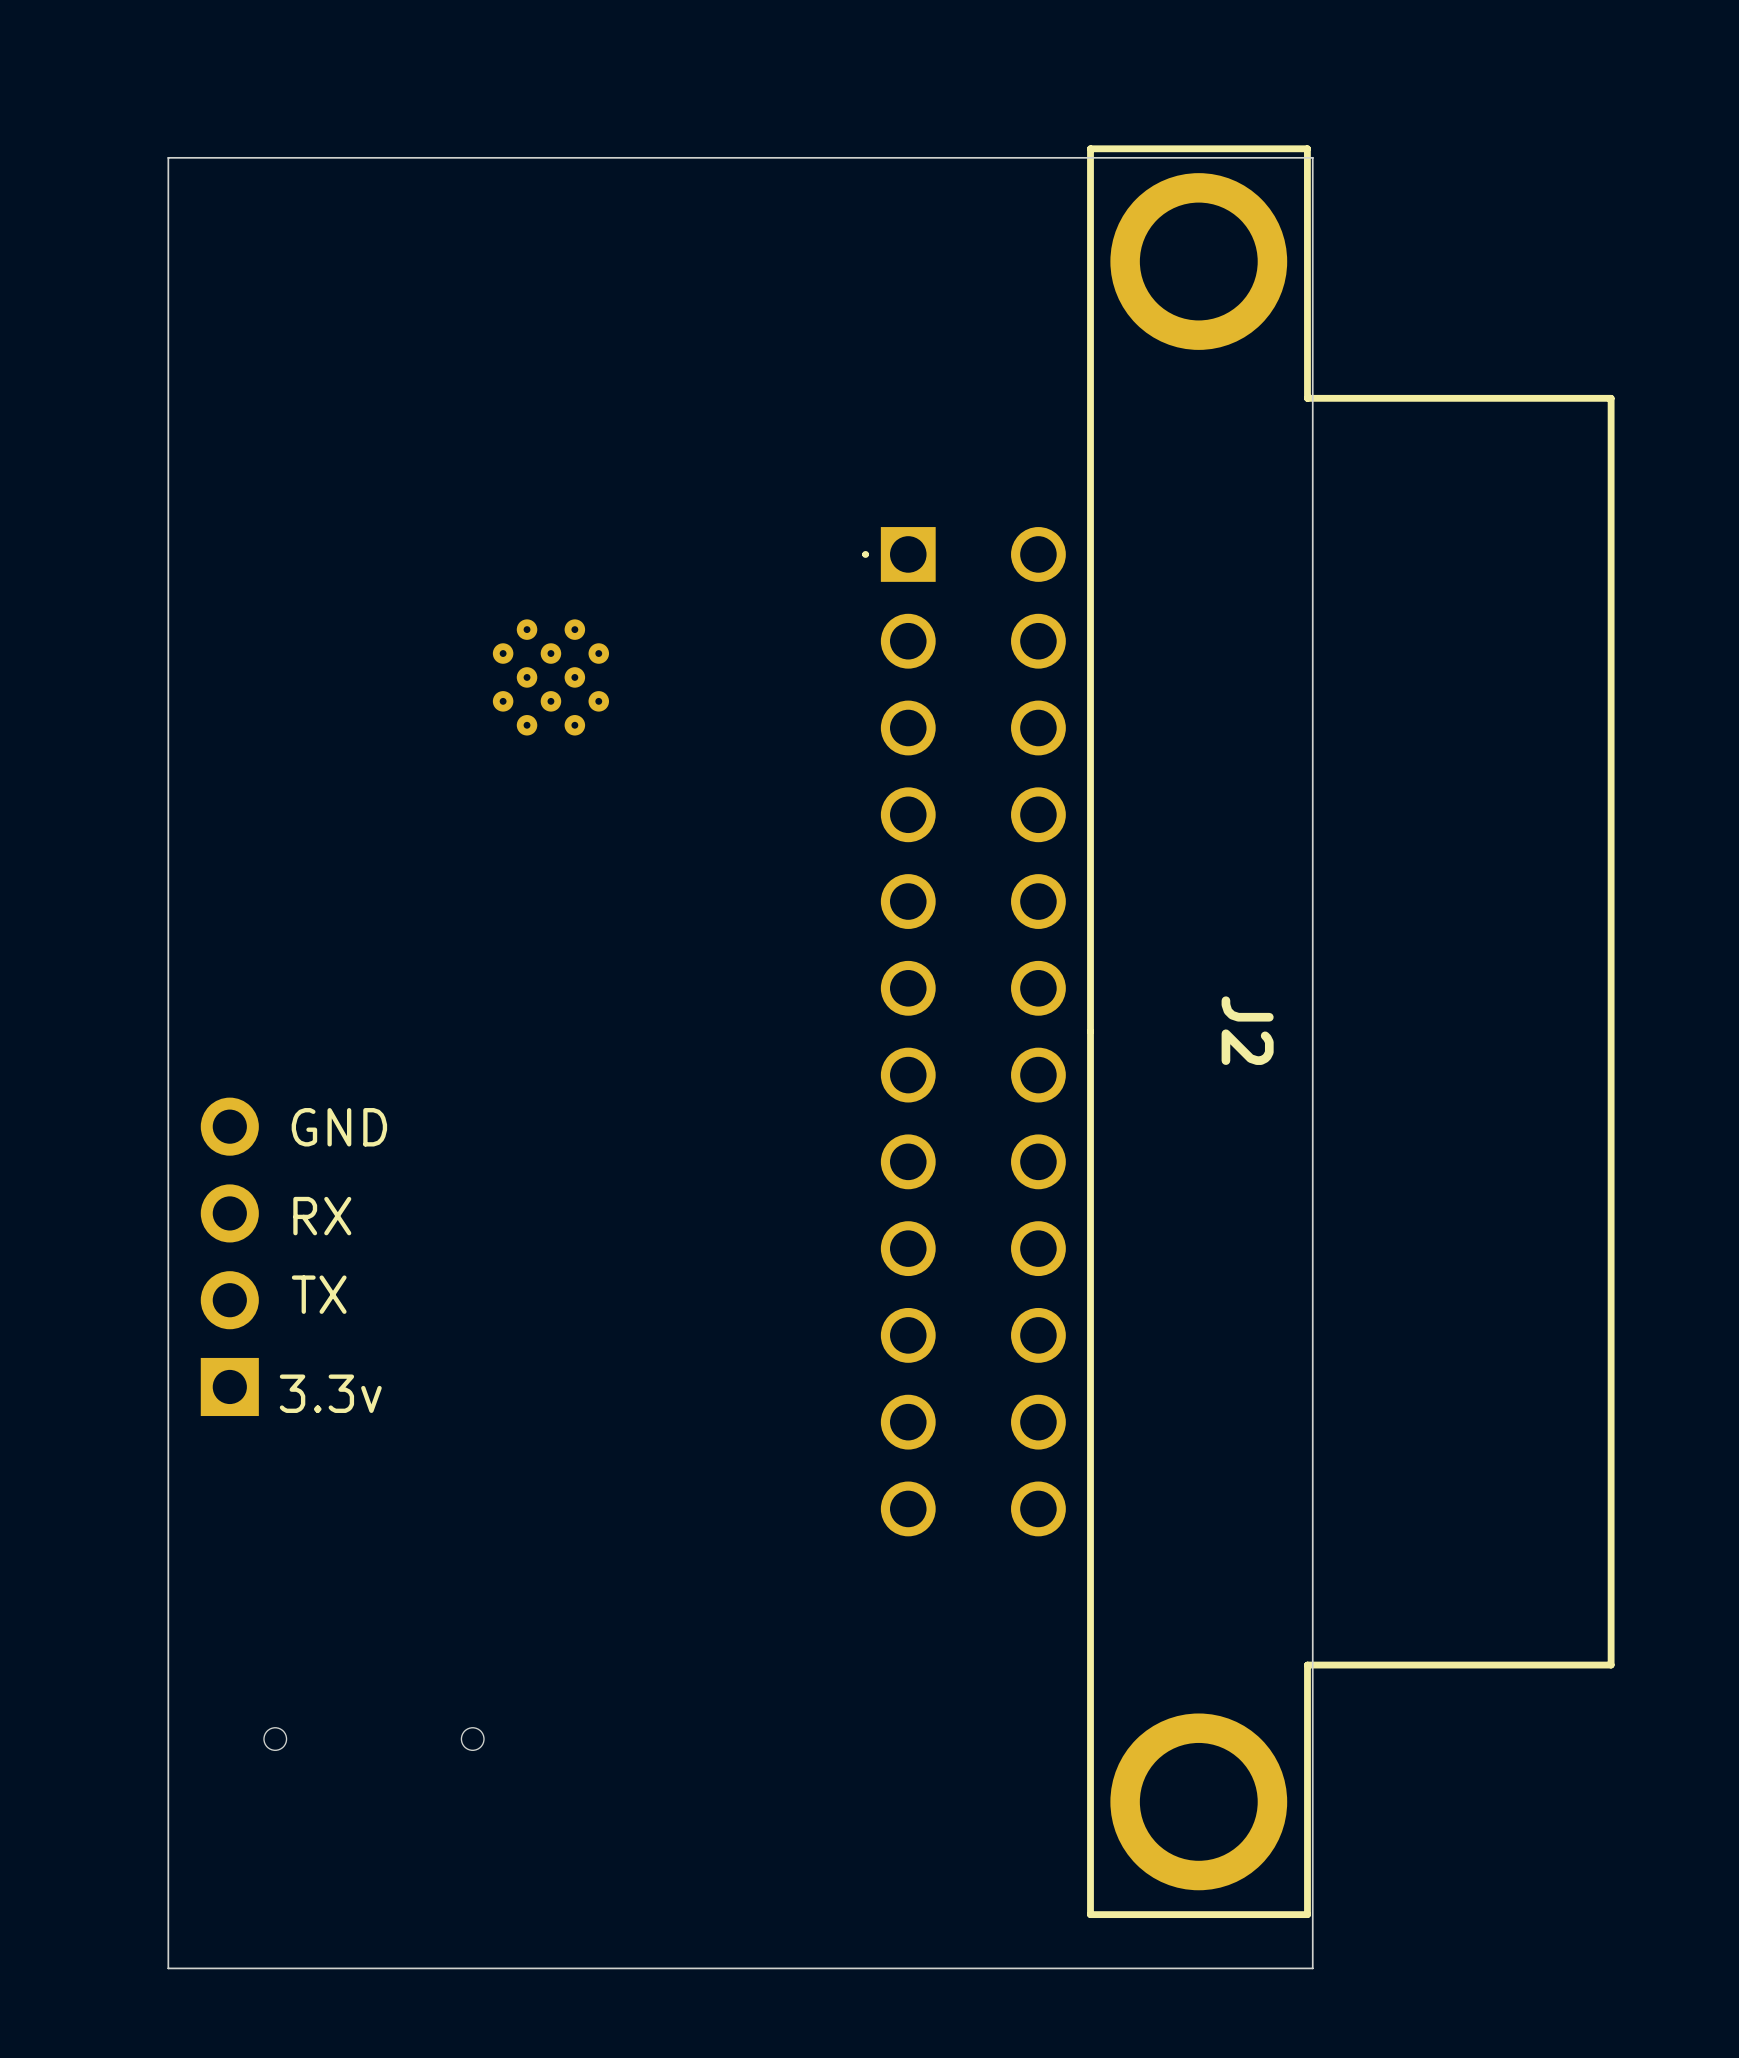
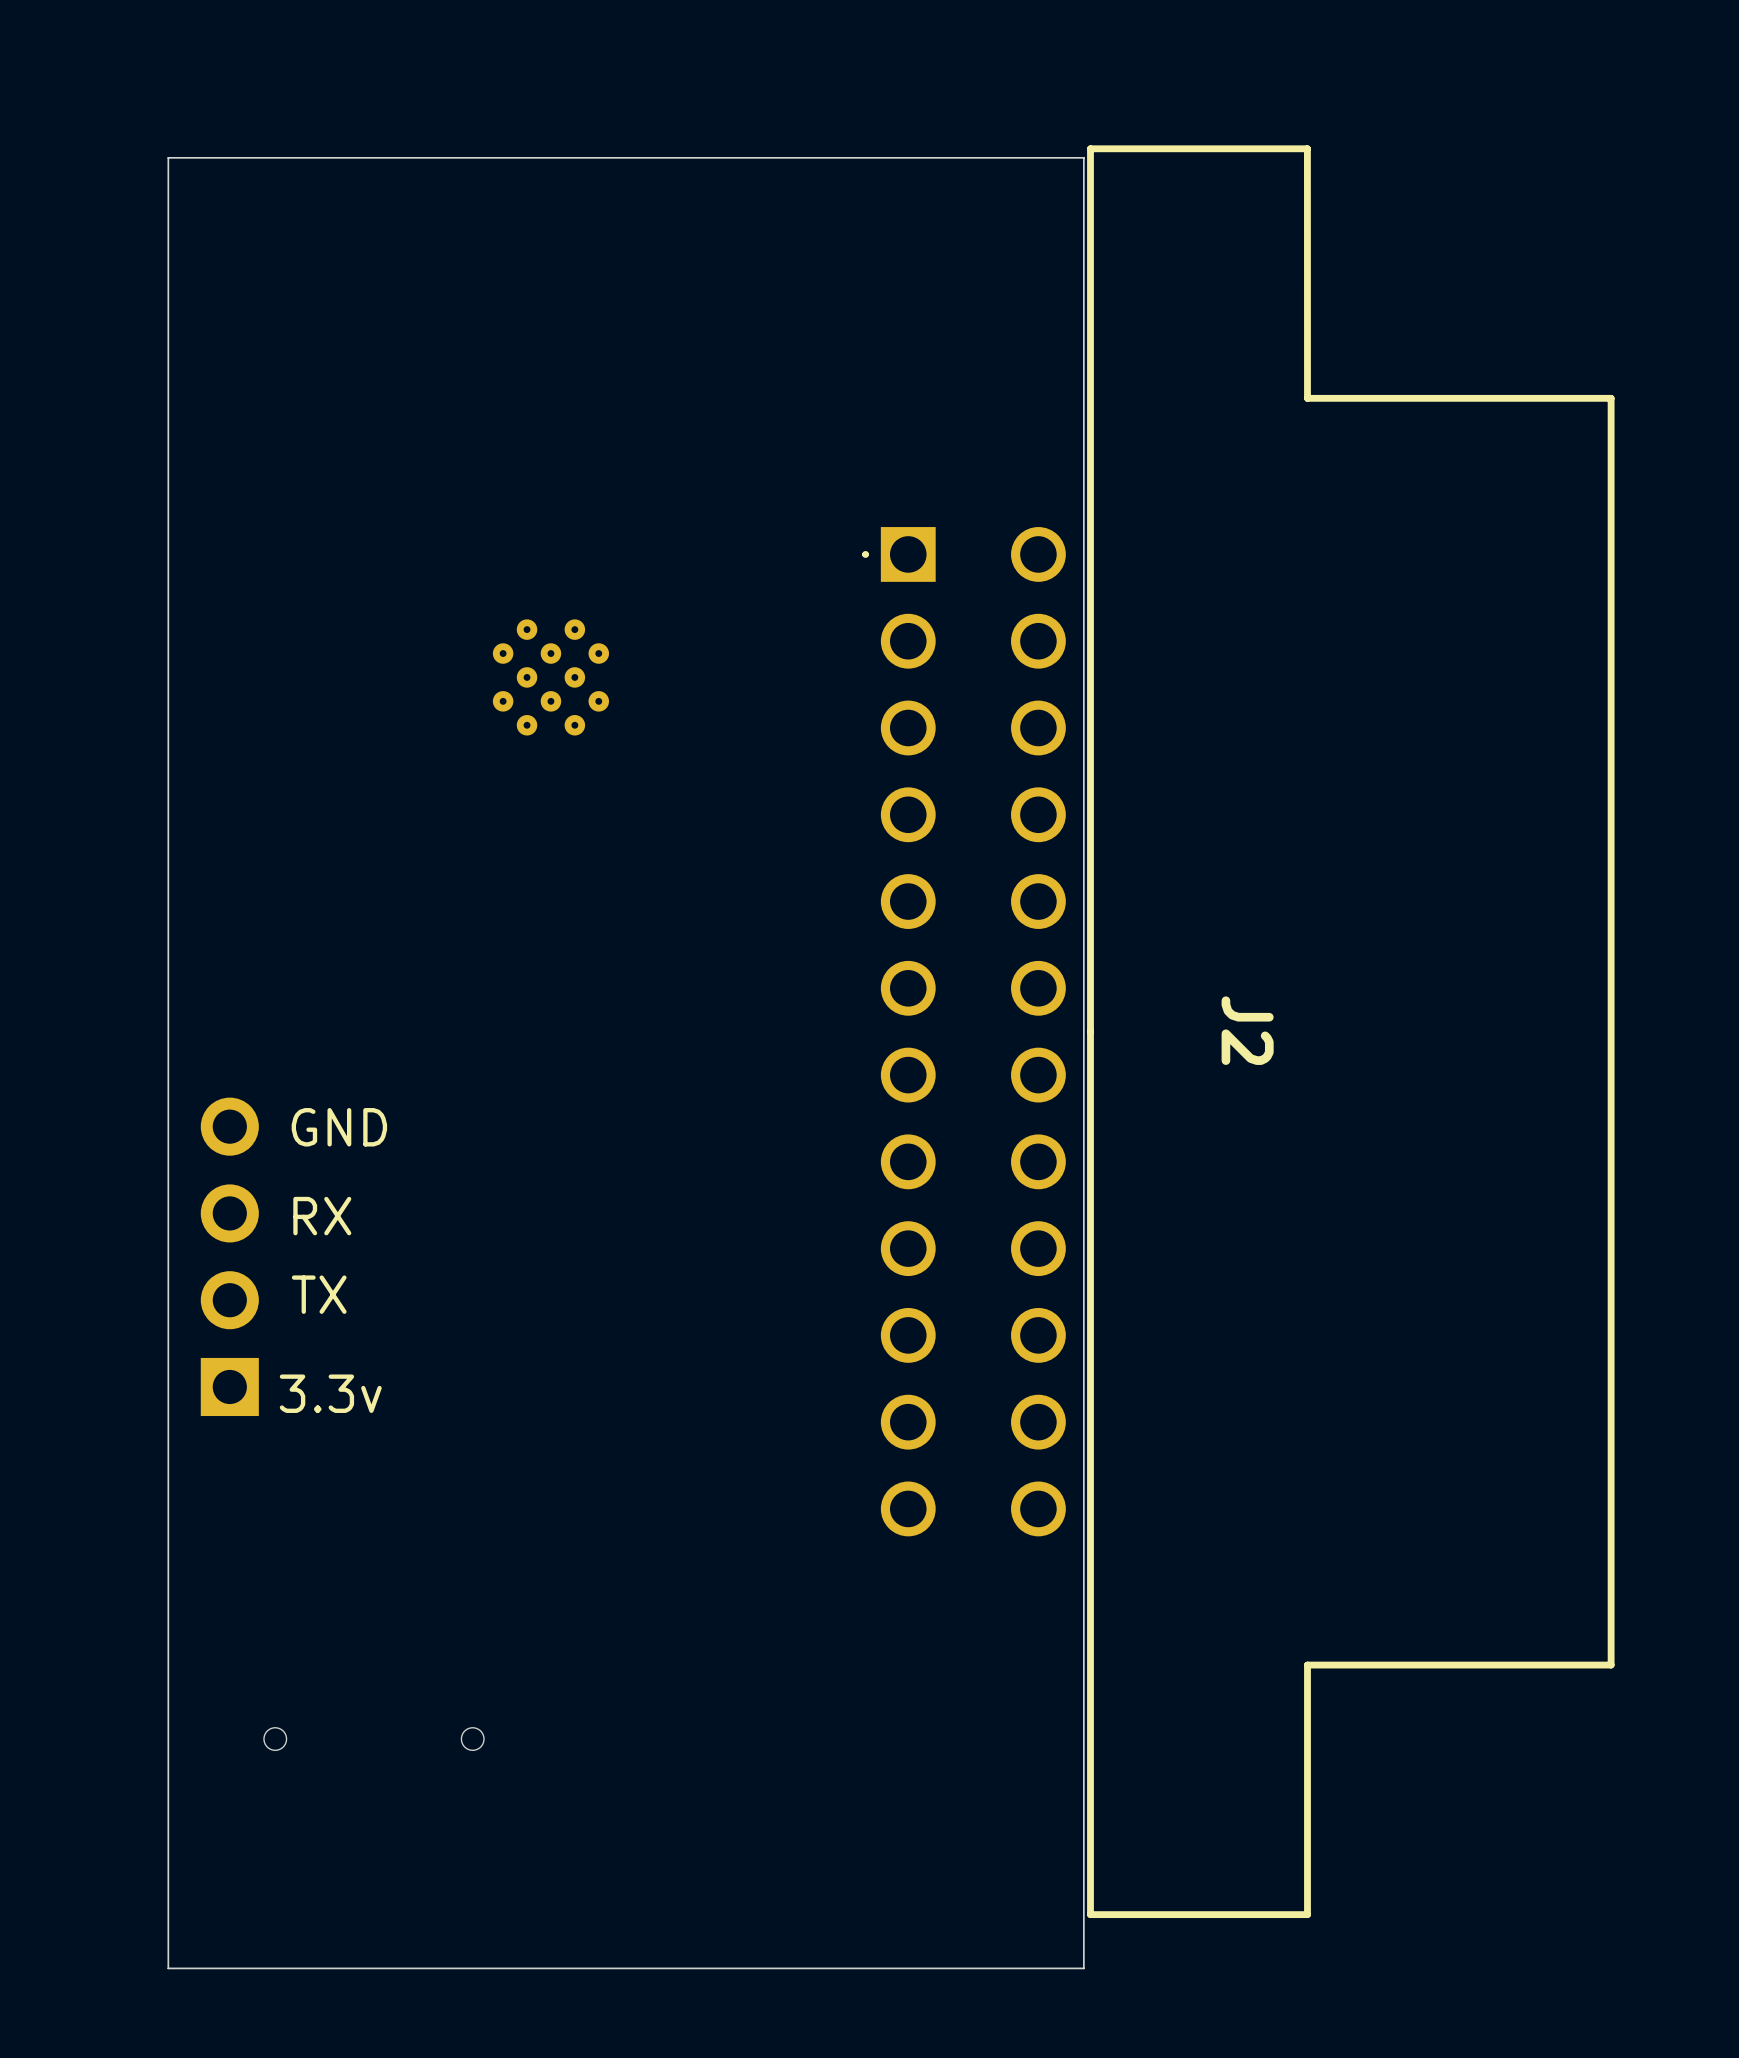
J2 footprint: [862, 145, 1615, 1919] -> [862, 145, 1615, 1919]
board edge: (1083, 157) (1312, 157) (1312, 1968) (1083, 1968) -> (1083, 157) (1083, 1968)

